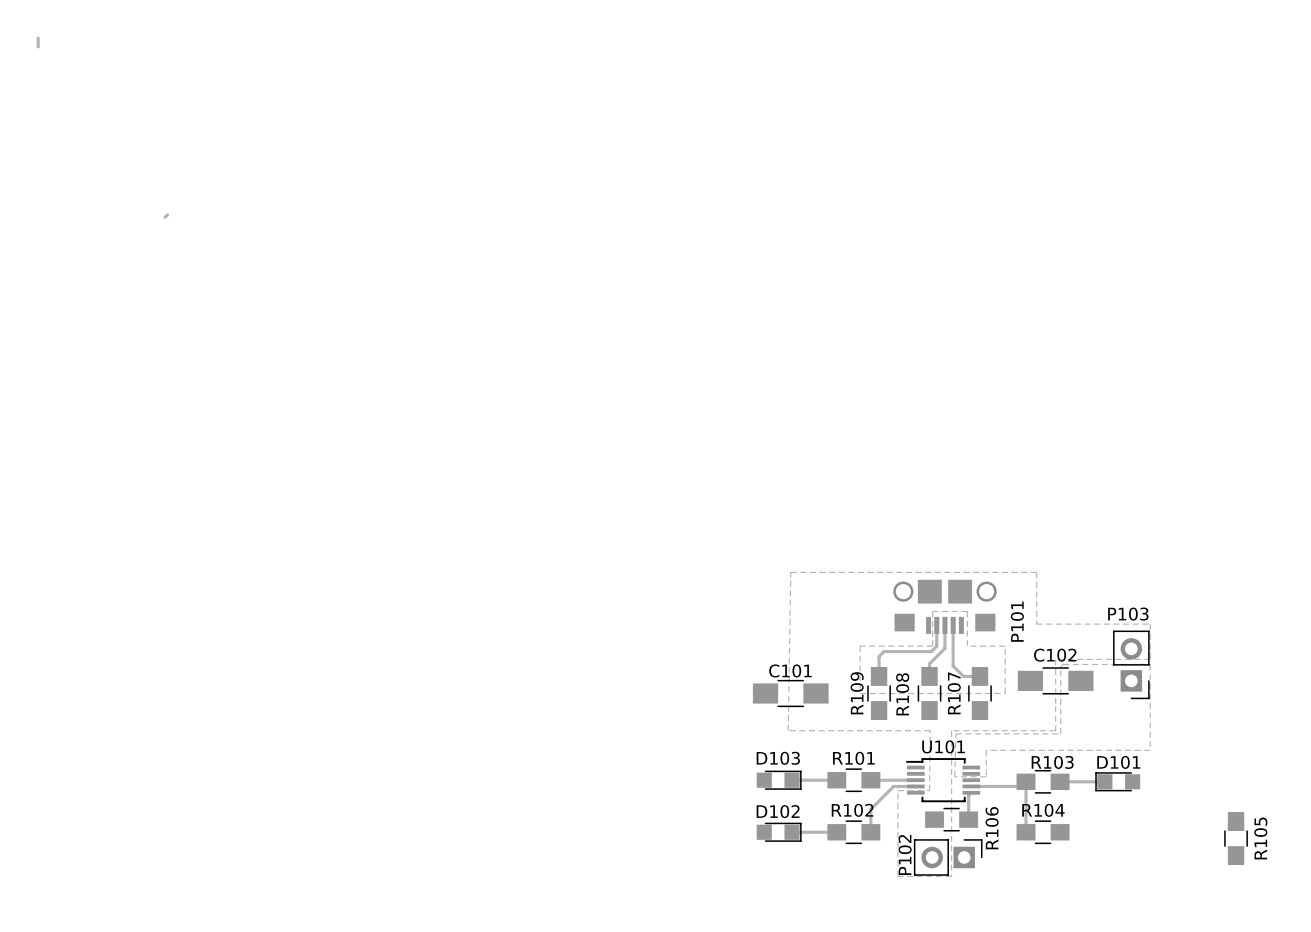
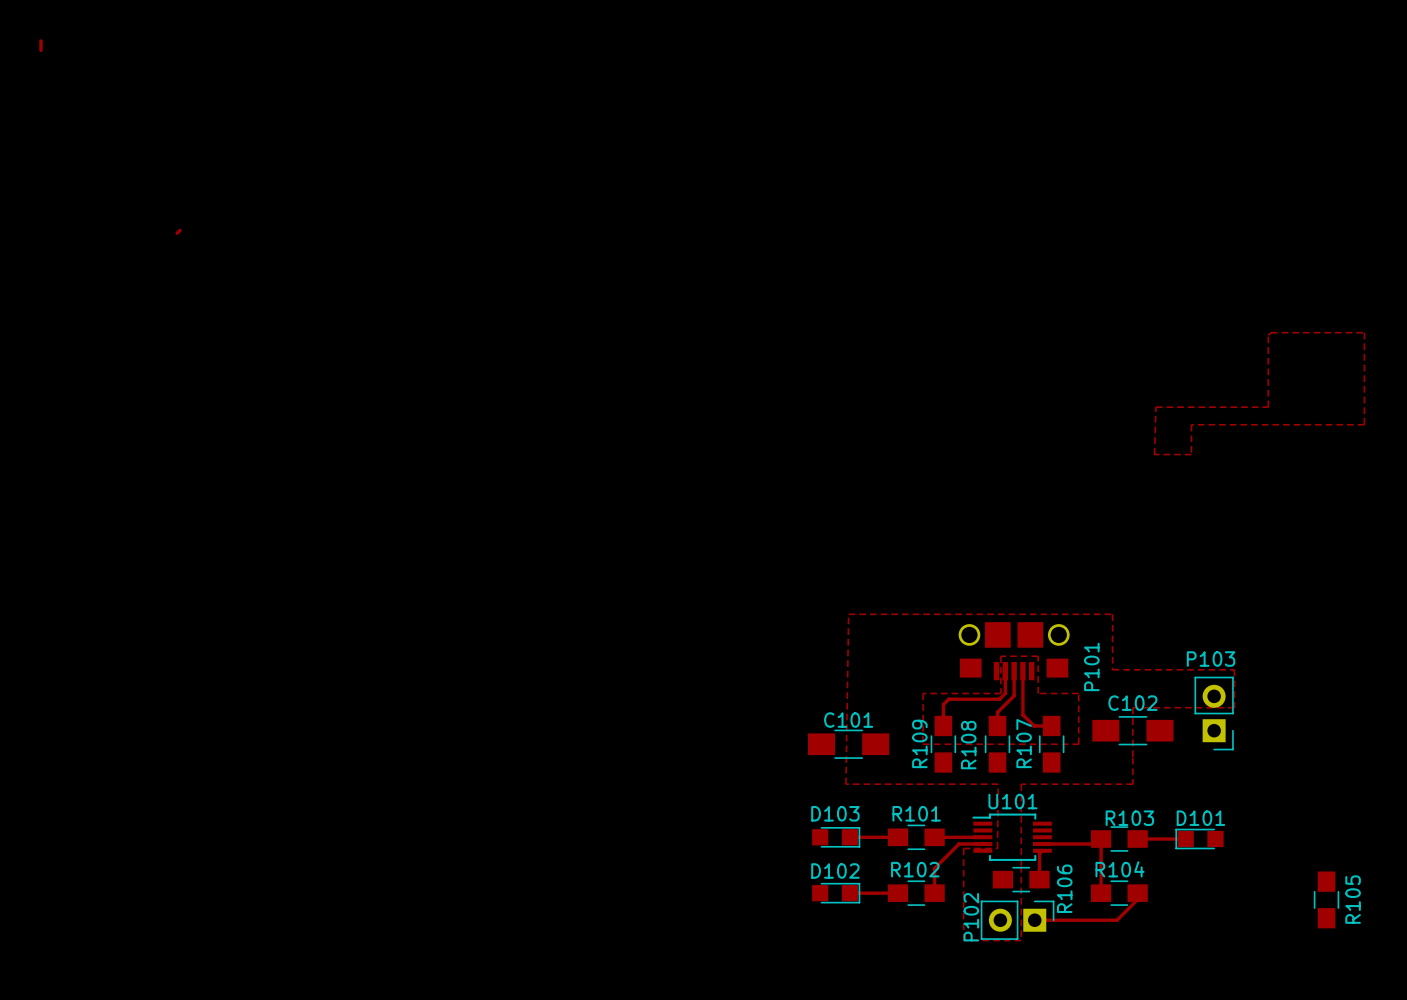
zone outline: none -> (1270, 332) (1364, 332) (1364, 424) (1191, 424) (1191, 454) (1154, 454) (1155, 407) (1268, 407) (1268, 335) (1270, 332)
zone outline: (1063, 664) (1150, 664) (1150, 750) (986, 750) (986, 776) (954, 776) (956, 733) (1060, 733) (1060, 667) (1063, 664) -> none
track: none -> (1137, 893) (1137, 899) (1117, 920) (1034, 920)

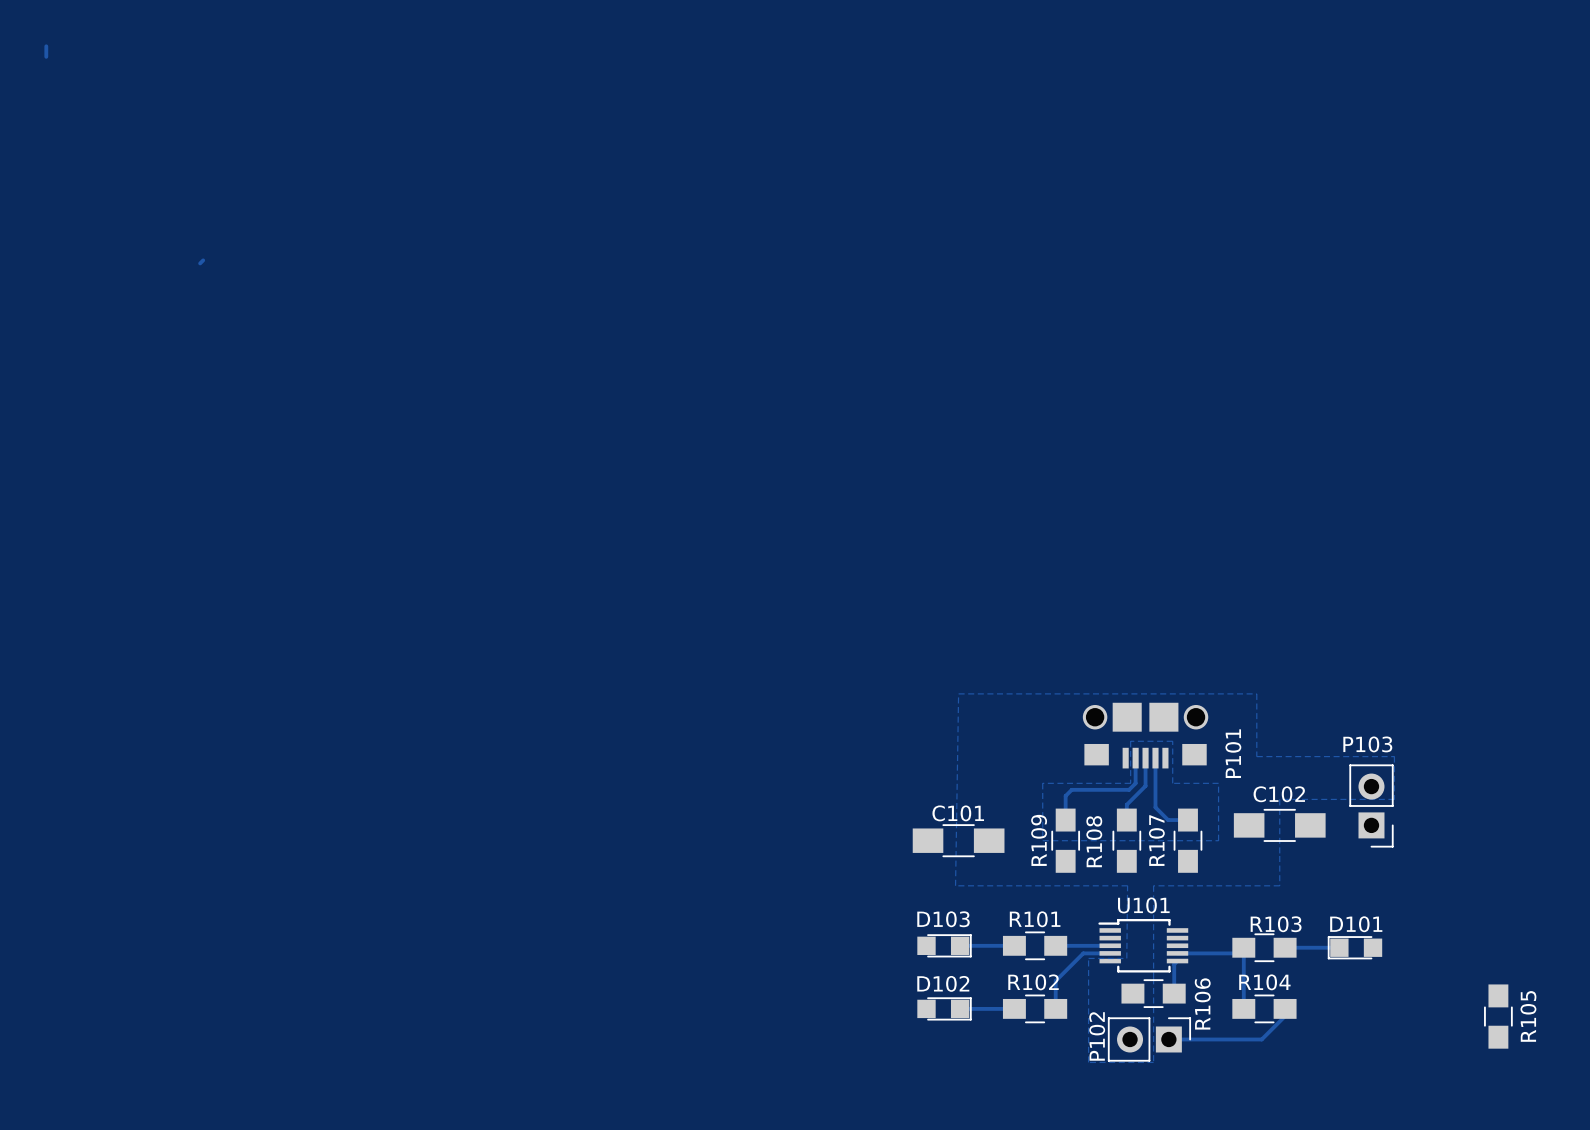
zone outline: (1270, 332) (1364, 332) (1364, 424) (1191, 424) (1191, 454) (1154, 454) (1155, 407) (1268, 407) (1268, 335) (1270, 332) -> none

